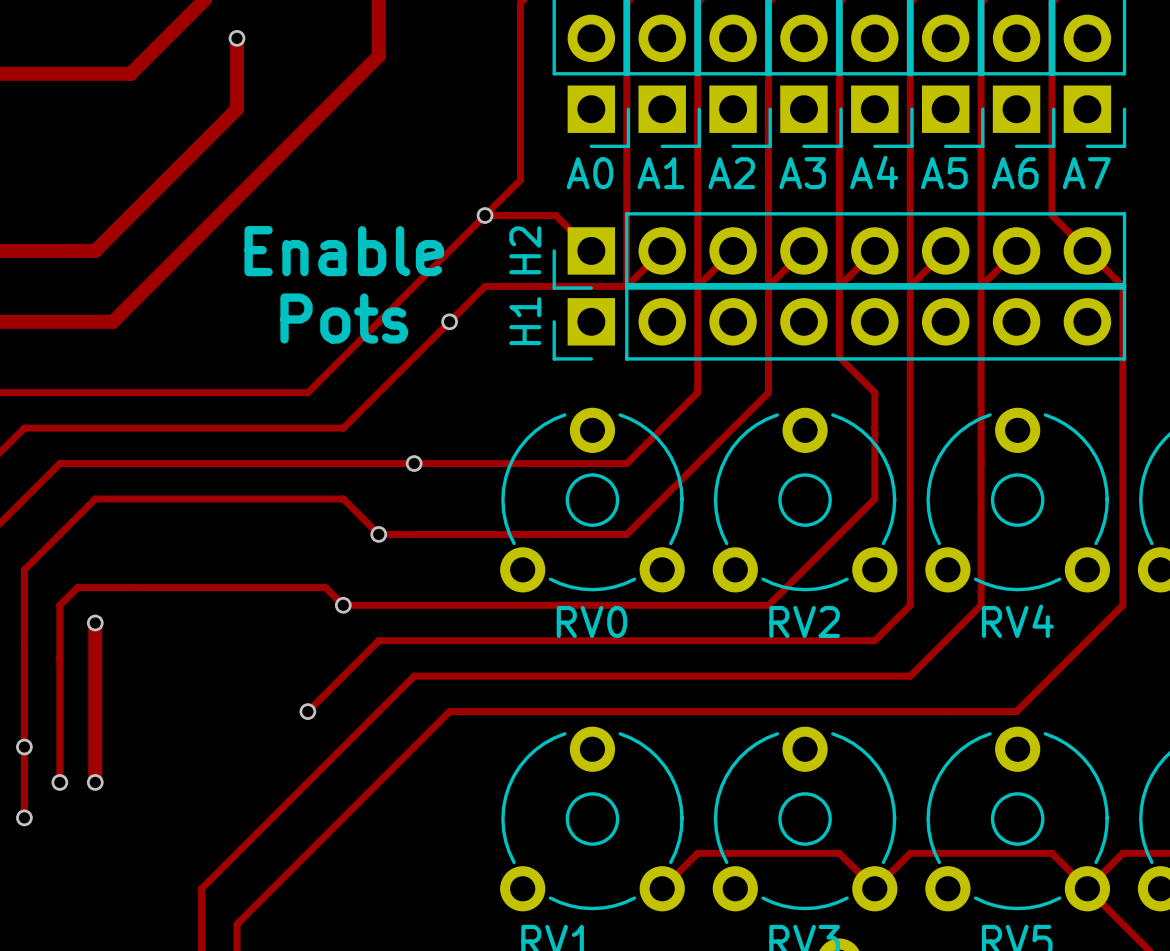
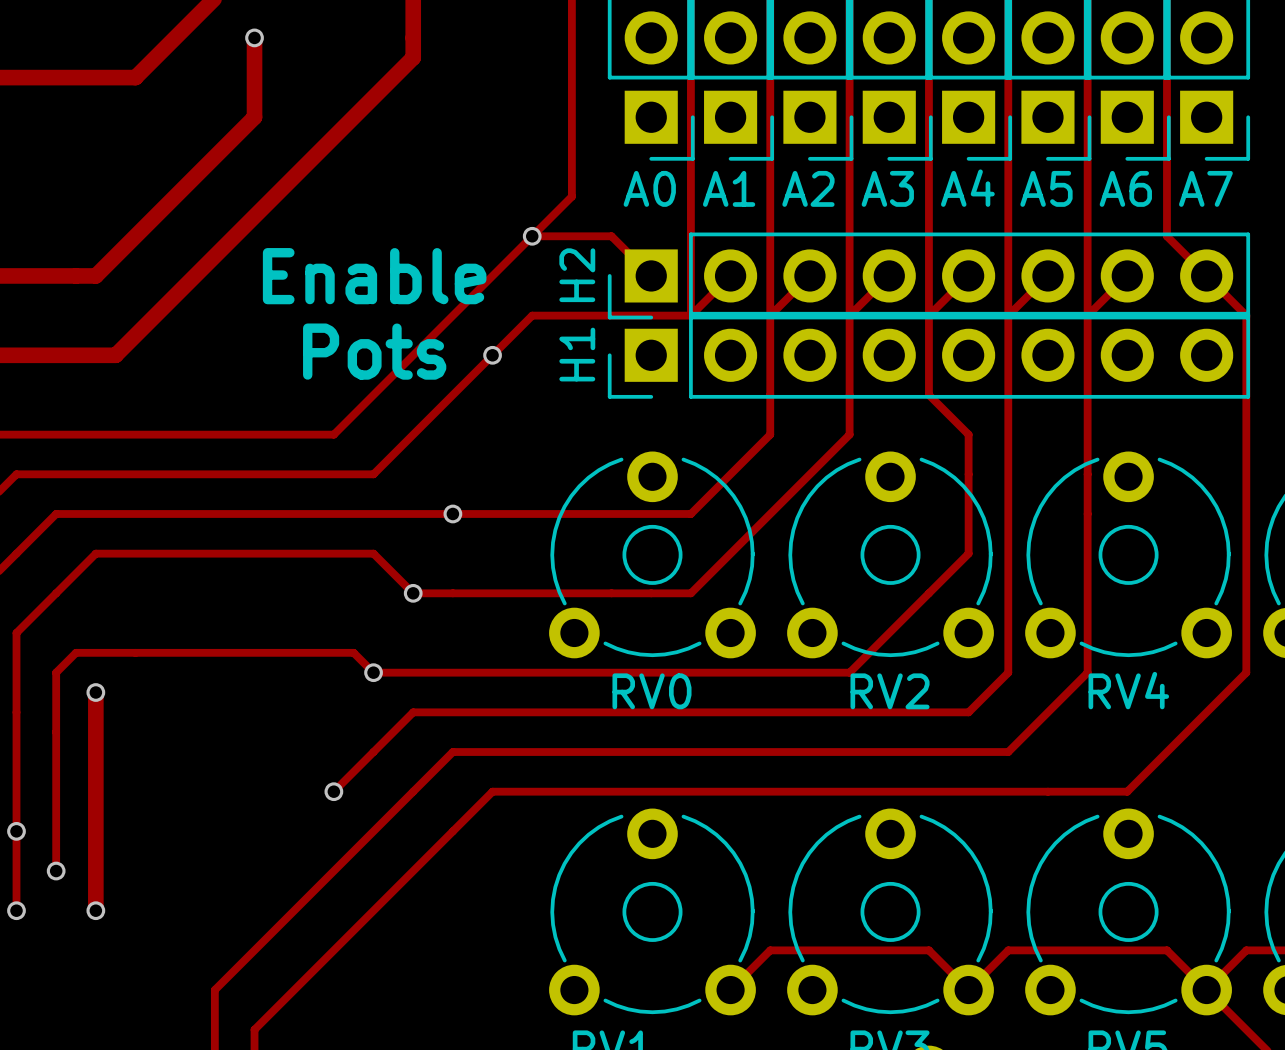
track: none -> (95, 871) (95, 910)
via position: (95, 782) -> (95, 910)

